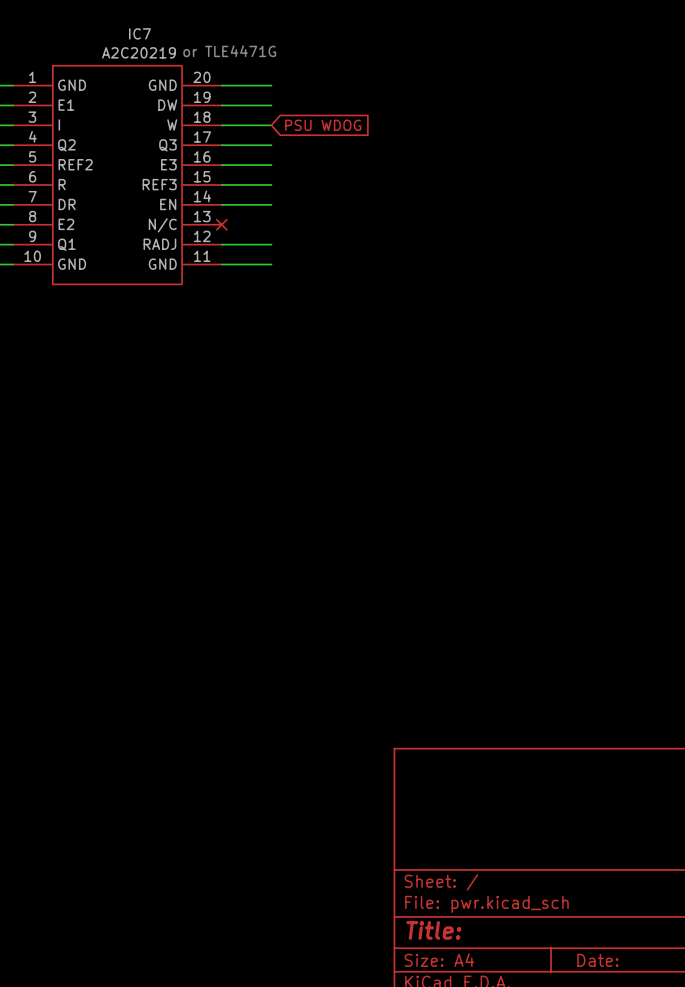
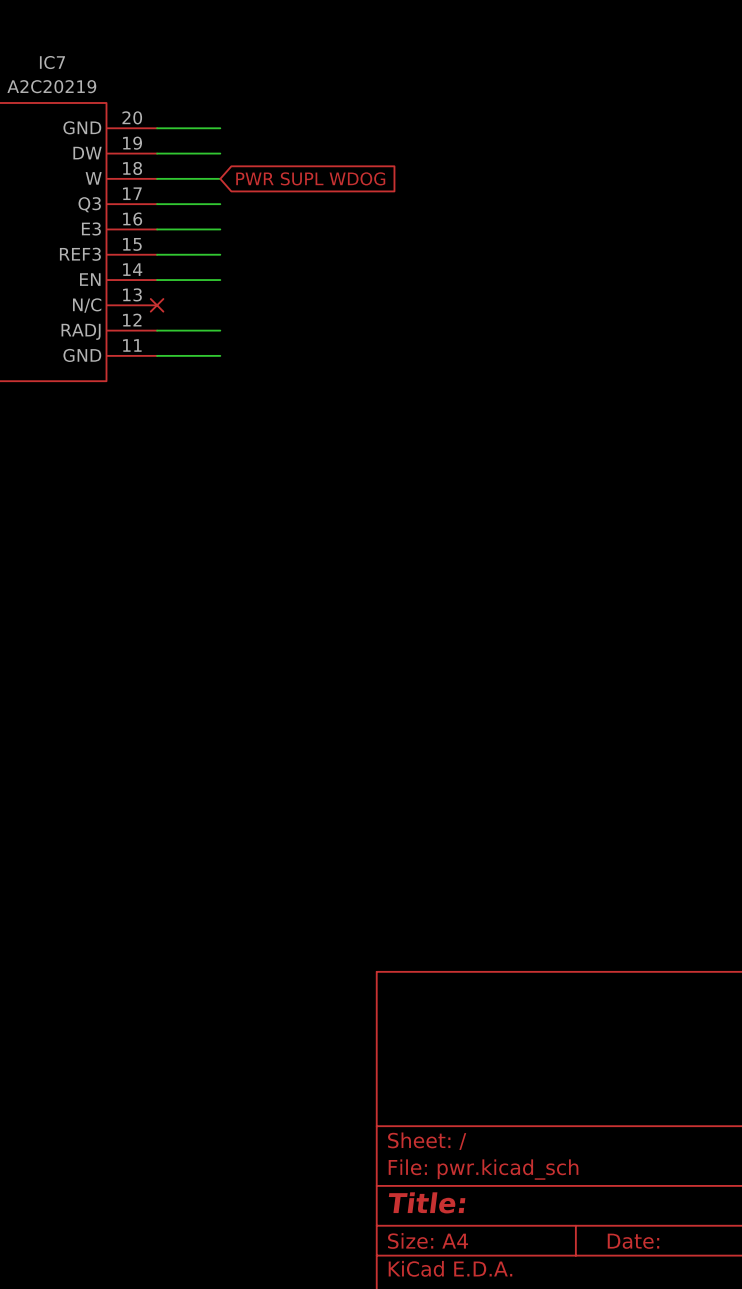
text: or TLE4471G (229, 51) -> none
global label: PSU WDOG (323, 125) -> PWR SUPL WDOG (310, 178)

